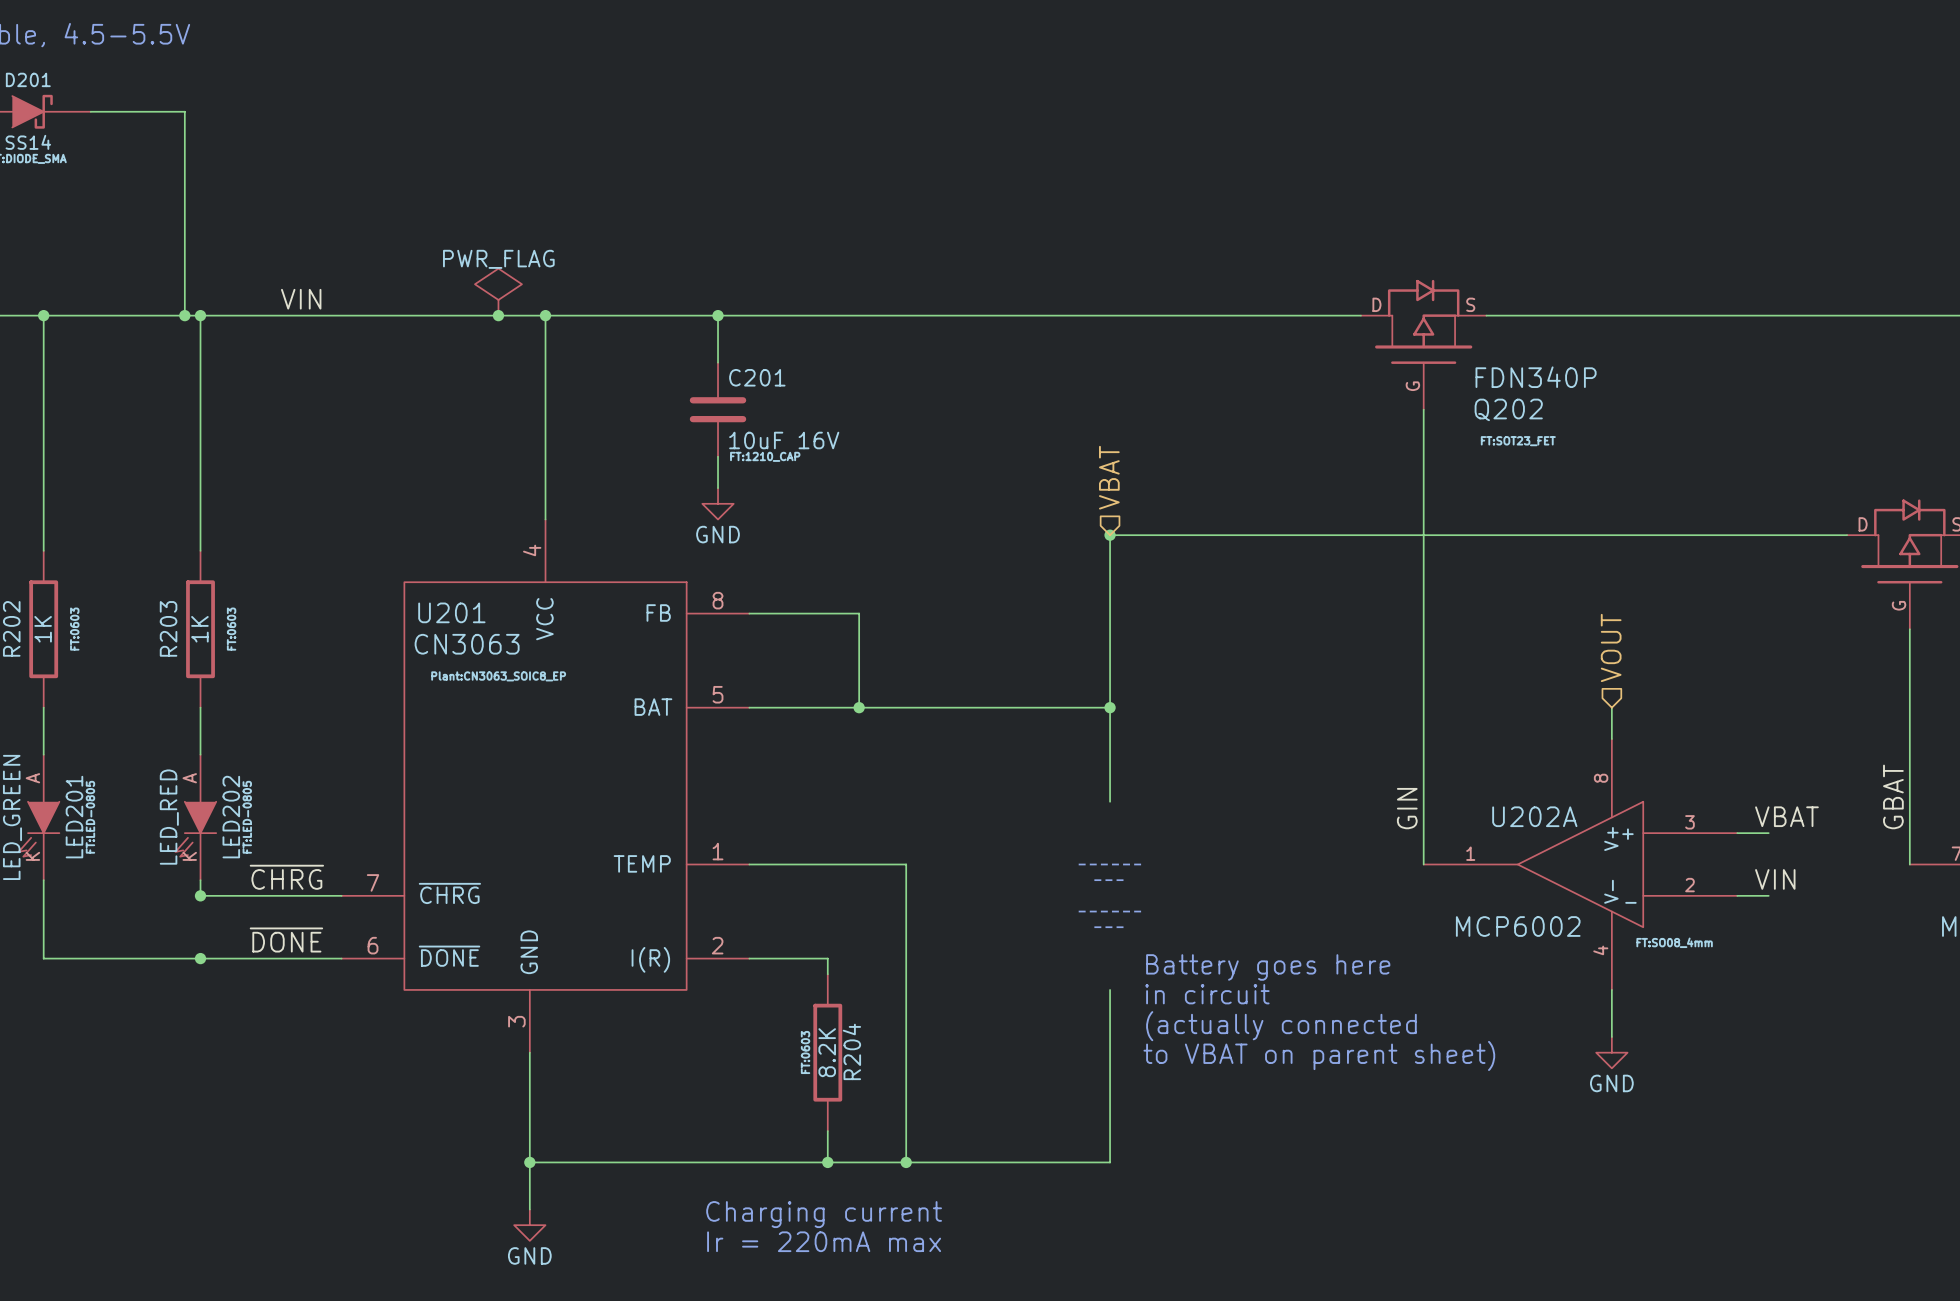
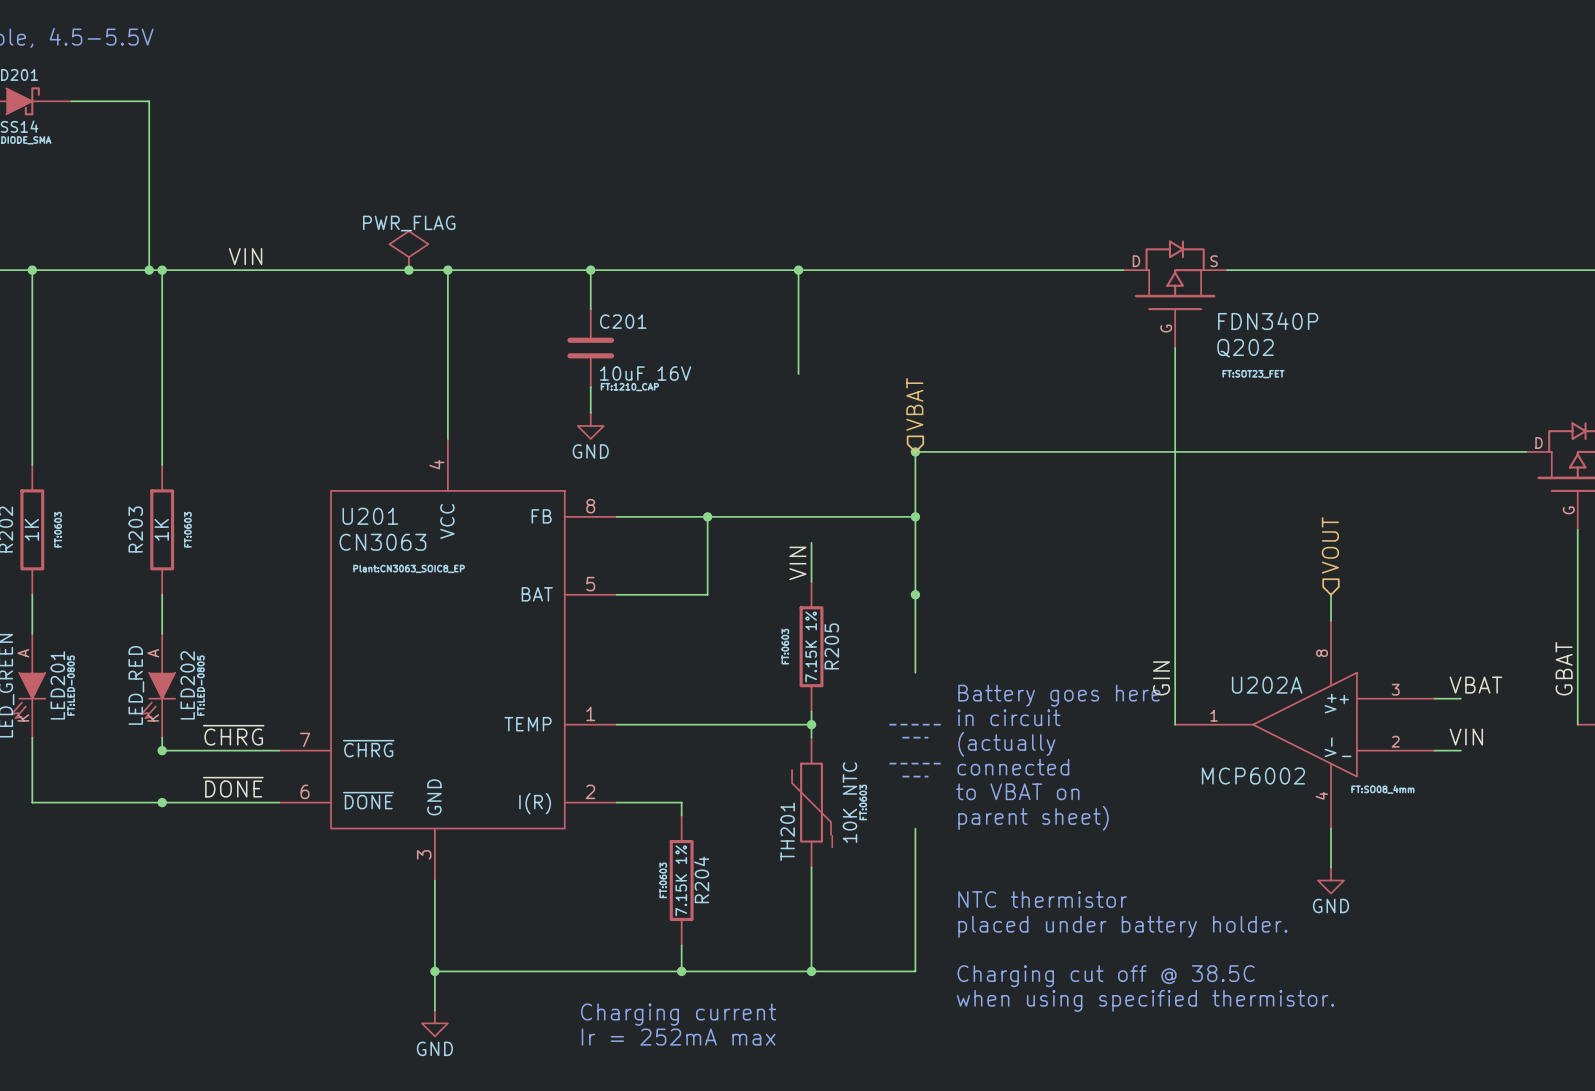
wire: none -> (798, 270) (798, 374)
junction: none -> (798, 270)
junction: none -> (707, 516)
junction: none -> (915, 516)
wire: none -> (811, 542) (811, 581)
label: none -> VIN (797, 563)
wire: (859, 707) (1110, 707) -> (707, 516) (915, 516)
junction: (859, 707) -> none
R205: none -> 7.15K 1% (811, 646)
wire: none -> (811, 711) (811, 737)
wire: (906, 864) (906, 1162) -> (746, 724) (811, 724)
junction: none -> (811, 724)
text: none -> (actually (1006, 744)
text: none -> connected (1013, 767)
text: none -> to VBAT on (1017, 791)
TH201: none -> 10K NTC (811, 802)
text position: Battery goes here (1268, 967) -> Battery goes here (1059, 695)
text: none -> parent sheet) (1033, 818)
text position: in circuit (1207, 994) -> in circuit (1009, 717)
text: (actually connected (1281, 1026) -> none
wire: none -> (811, 867) (811, 971)
R204 value: 8.2K (827, 1052) -> 7.15K 1% (681, 880)
text: to VBAT on parent sheet) (1319, 1055) -> none
text: none -> NTC thermistor (1042, 899)
text: none -> placed under battery holder. (1122, 926)
junction: (906, 1162) -> none
junction: none -> (811, 971)
text: none -> Charging cut off @ 38.5C (1106, 976)
text: none -> when using specified thermistor. (1145, 1000)
text: Ir = 220mA max (824, 1241) -> Ir = 252mA max (678, 1037)

